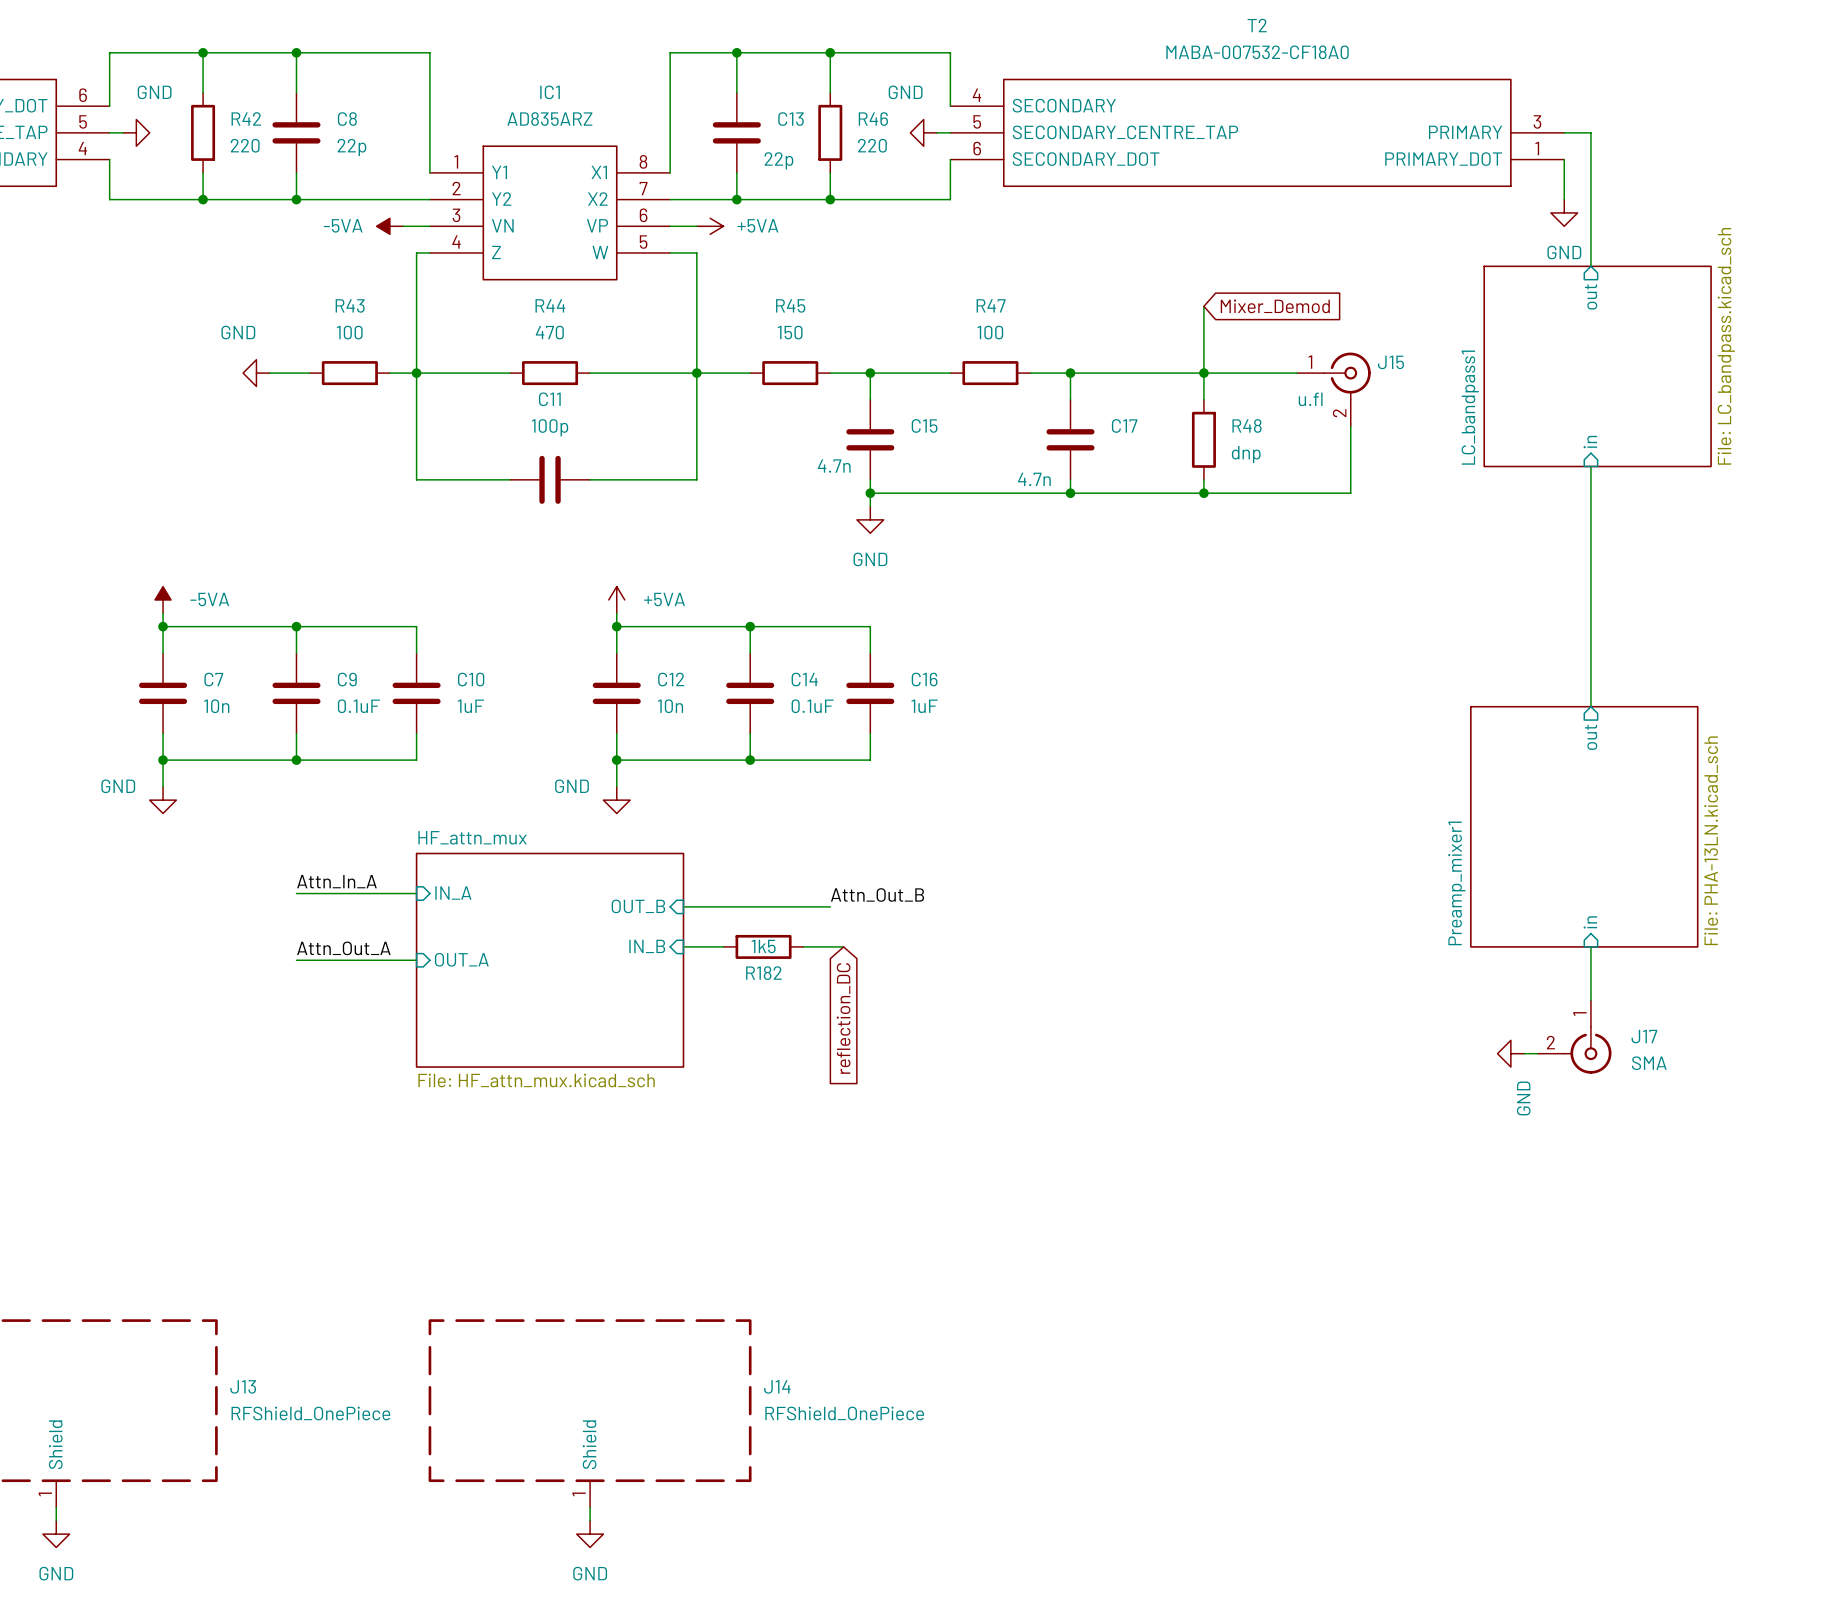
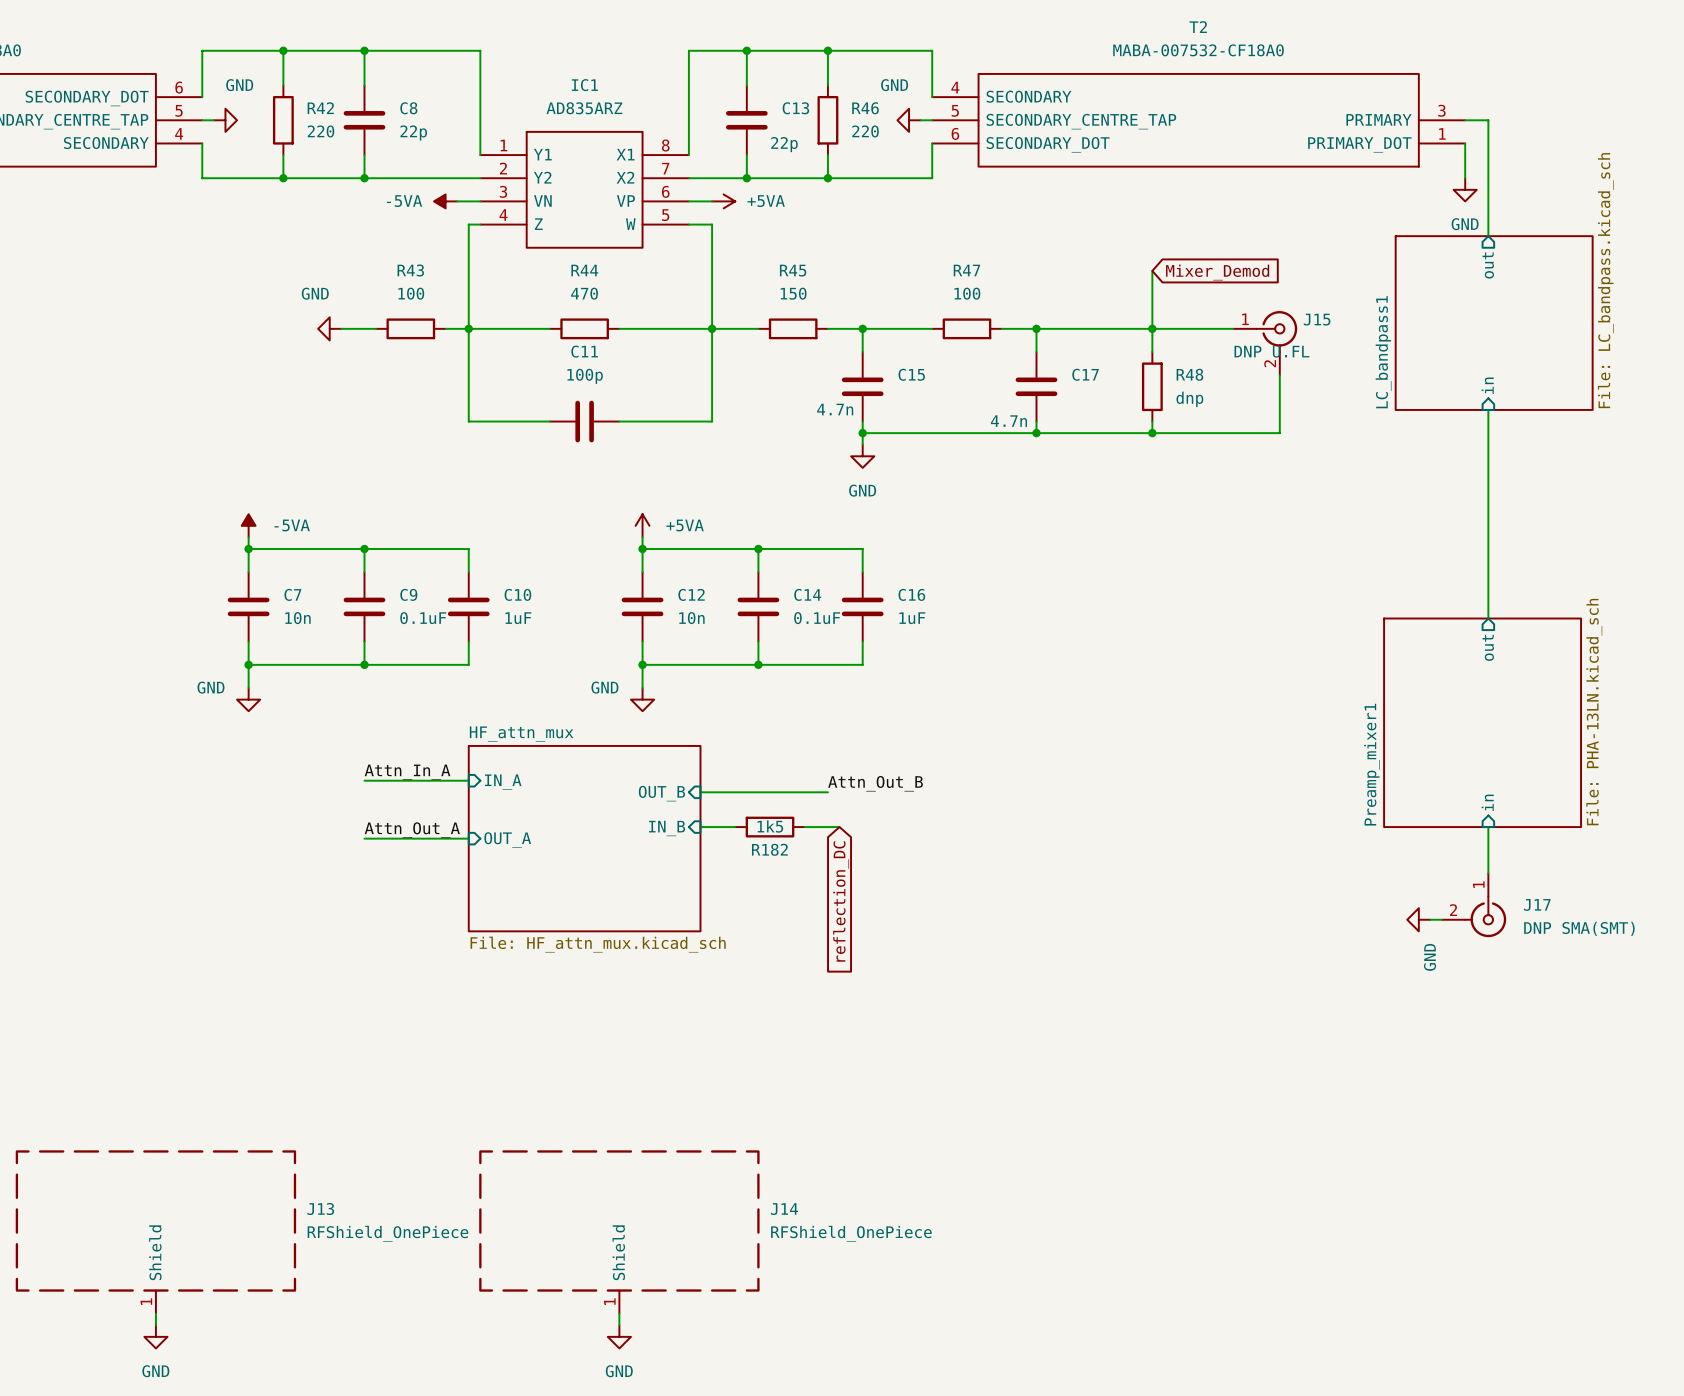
J15 value: u.fl (1310, 399) -> DNP U.FL (1271, 351)
J17 value: SMA (1649, 1063) -> DNP SMA(SMT) (1579, 928)

